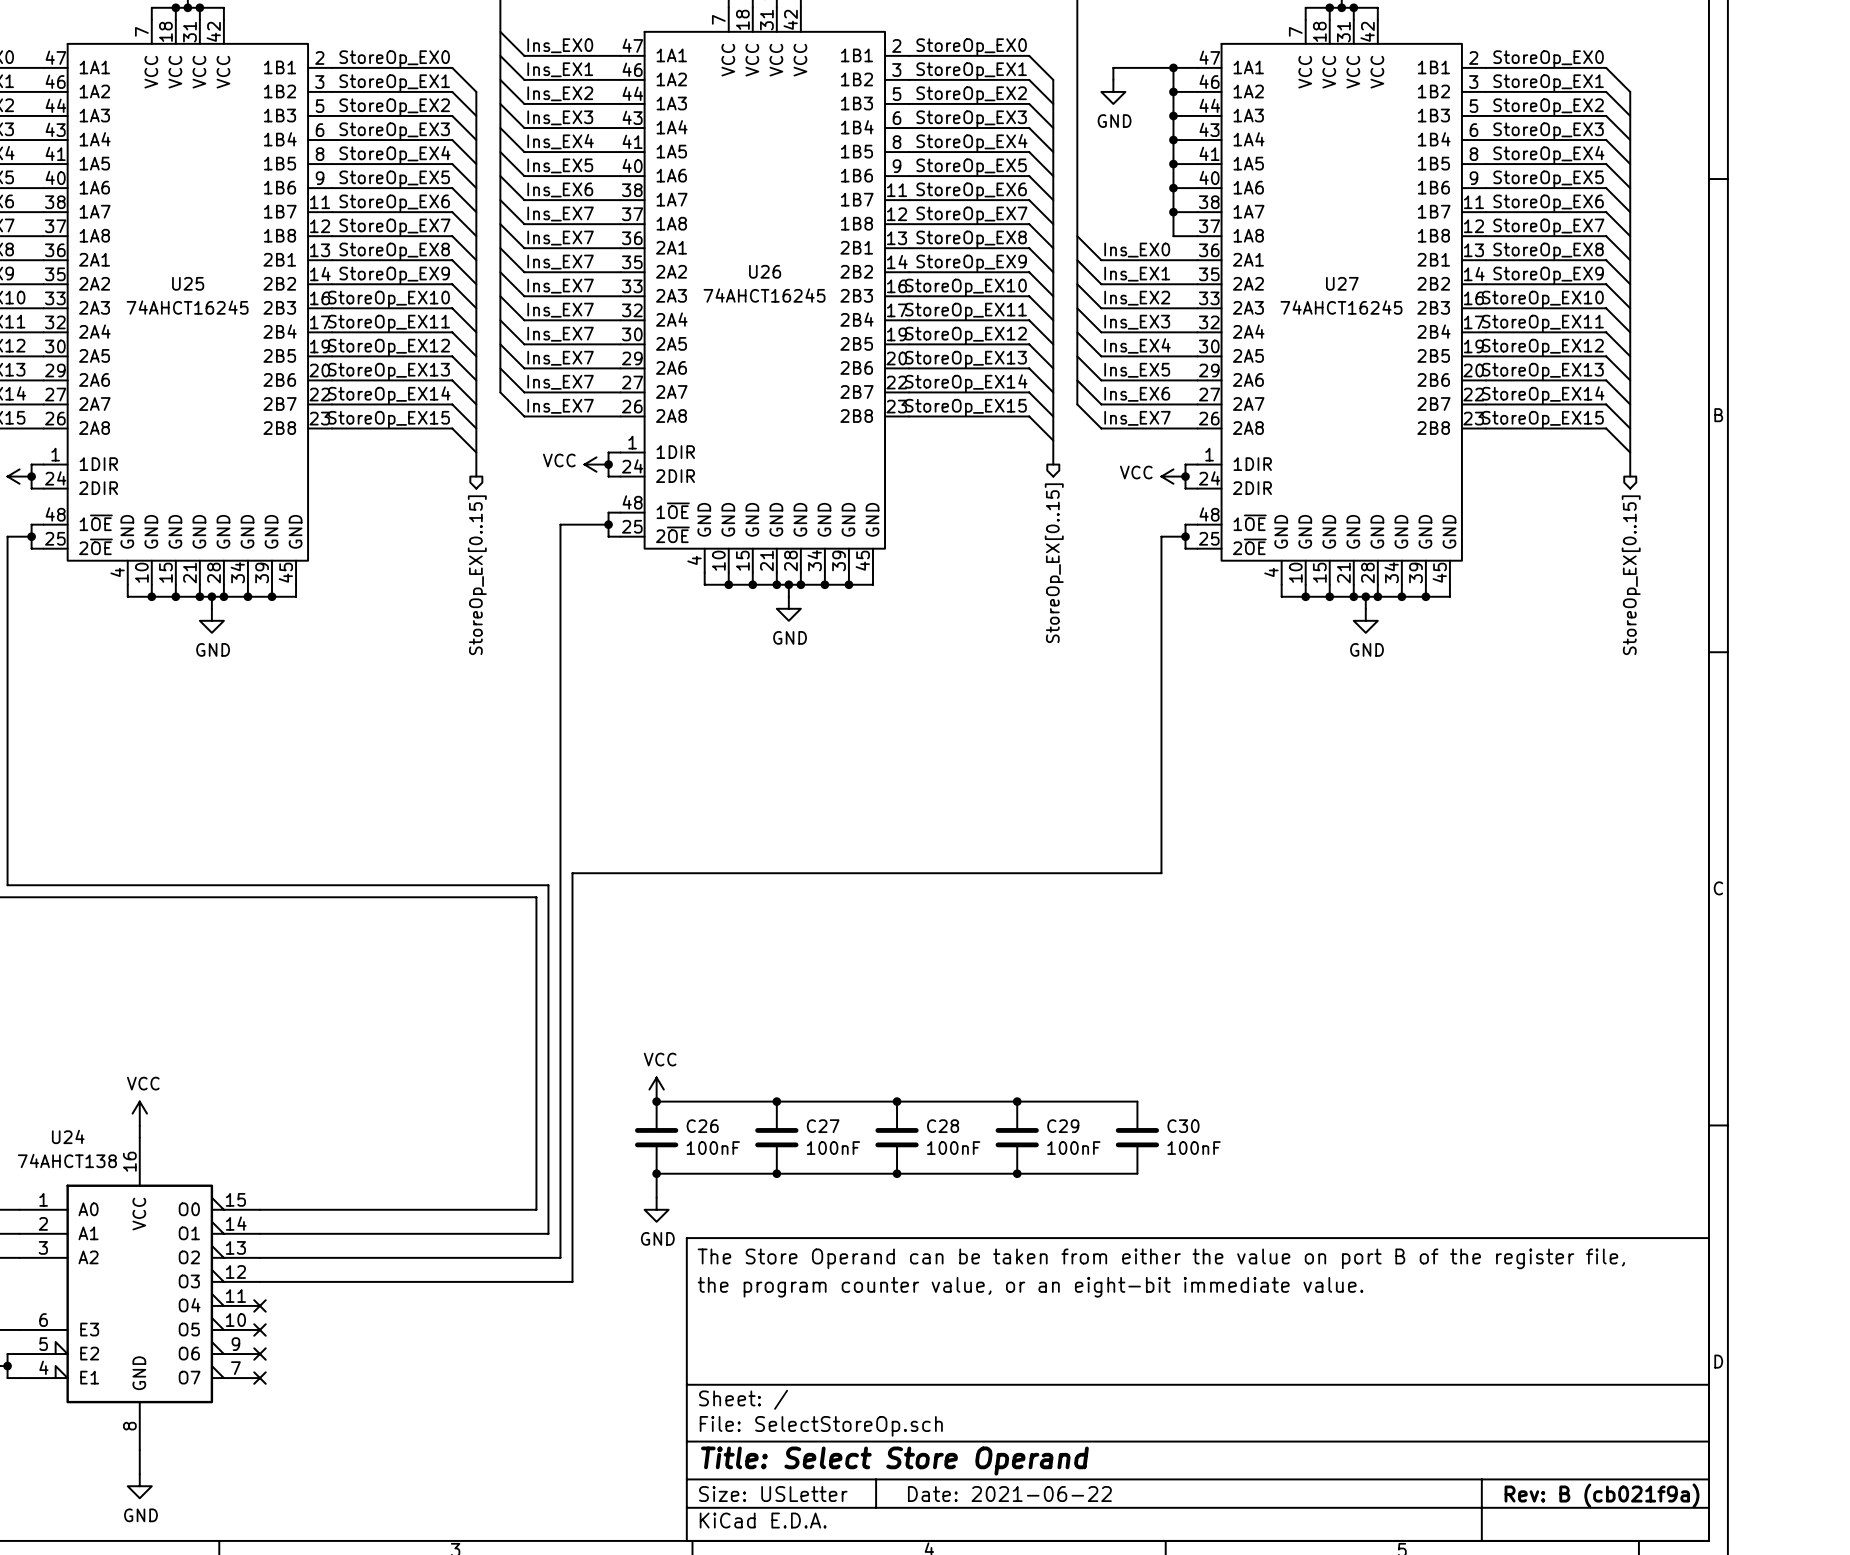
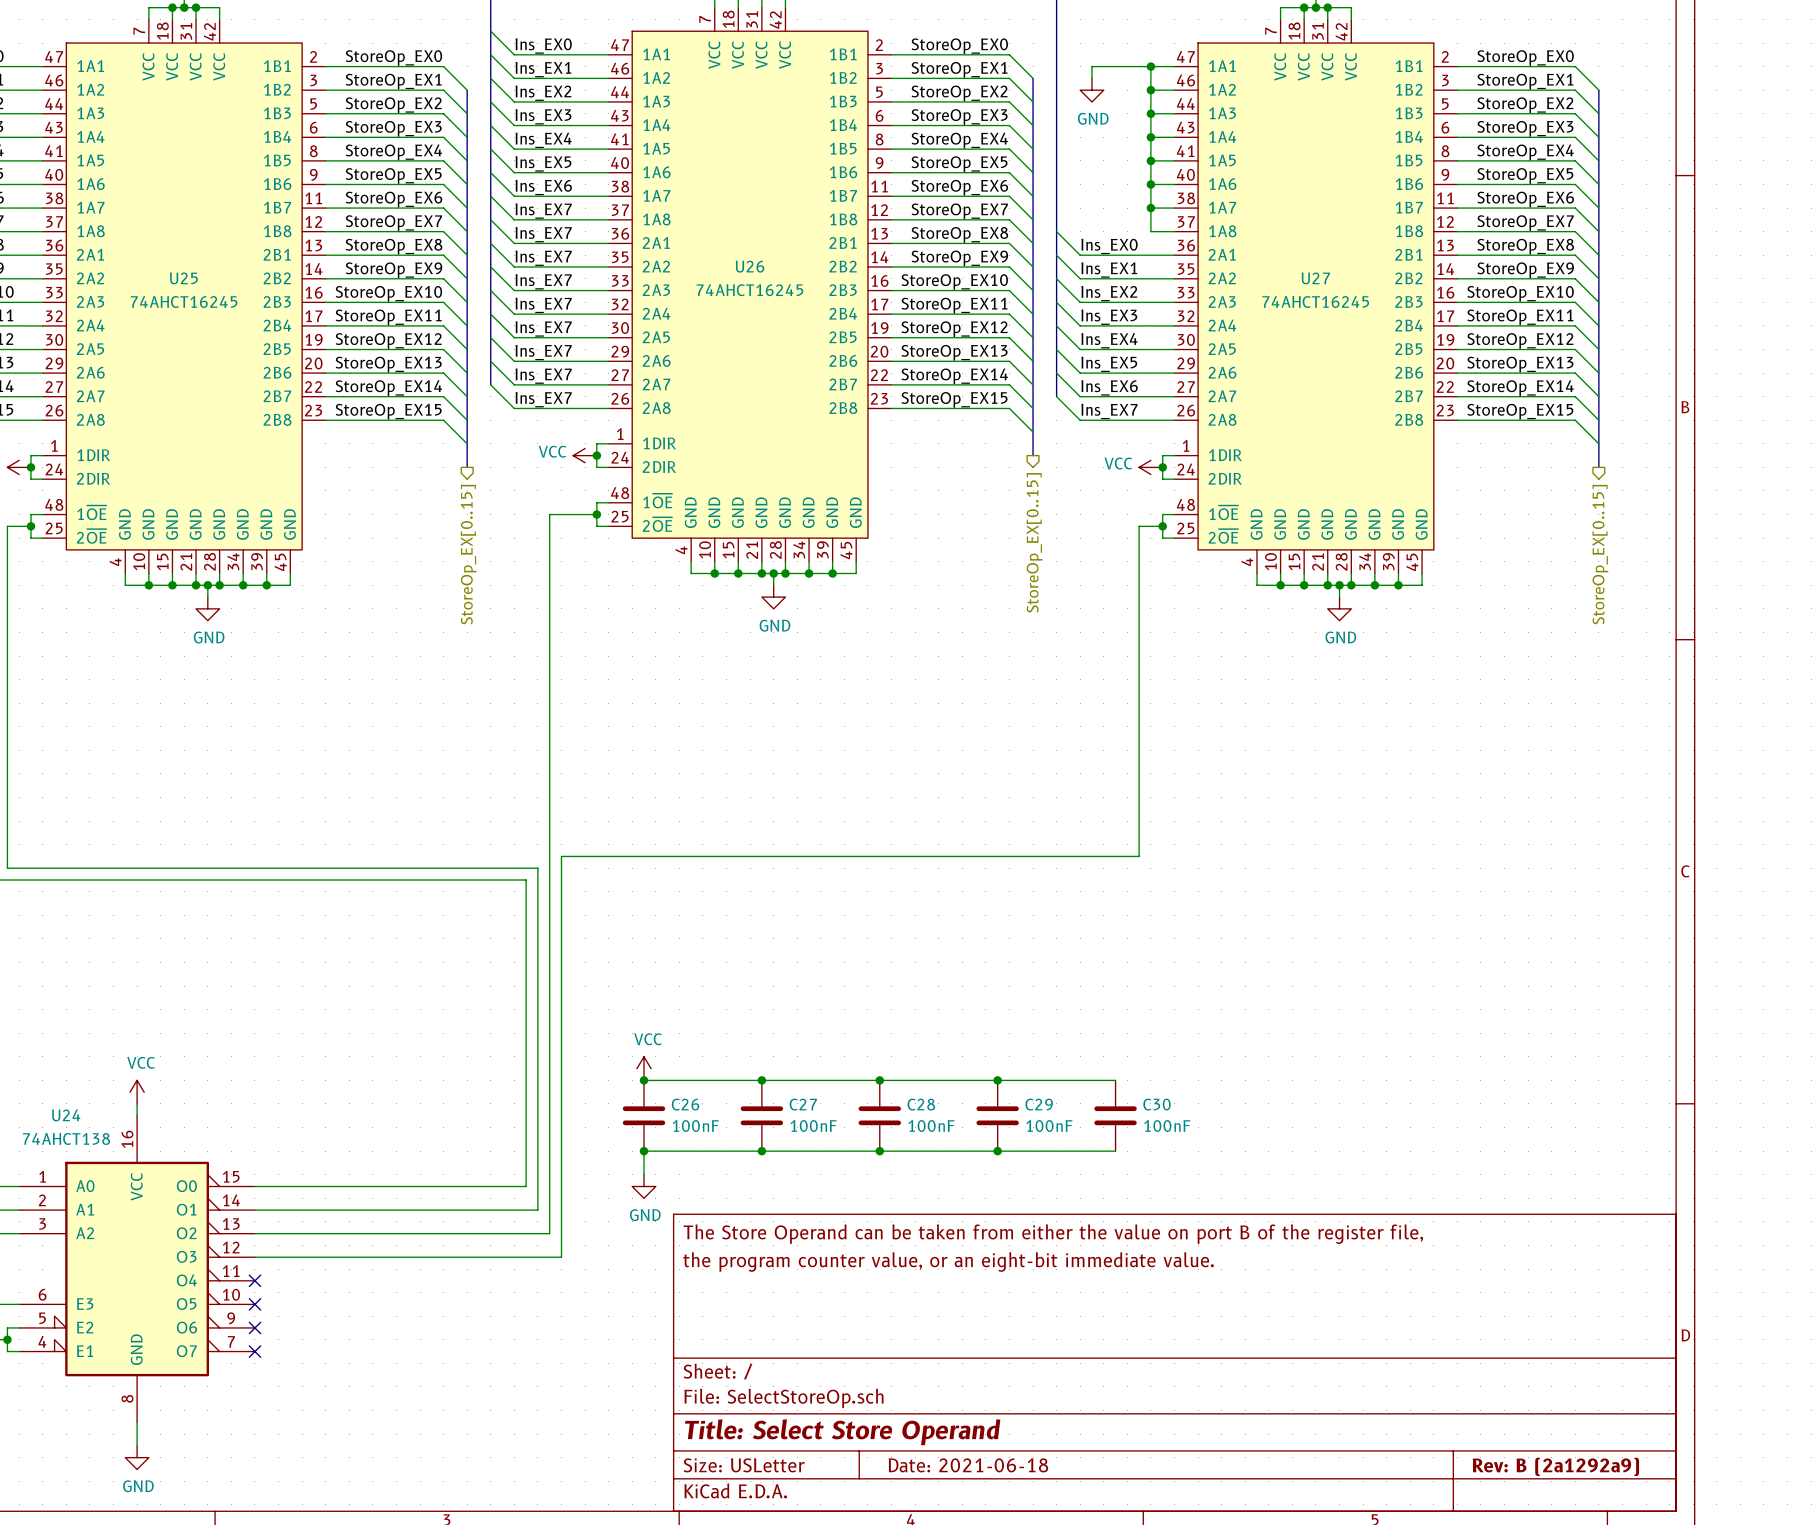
title block: Date: 2021-06-22 (1009, 1494) -> Date: 2021-06-18 (968, 1465)
title block: Rev: B (cb021f9a) (1602, 1495) -> Rev: B (2a1292a9) (1555, 1466)

